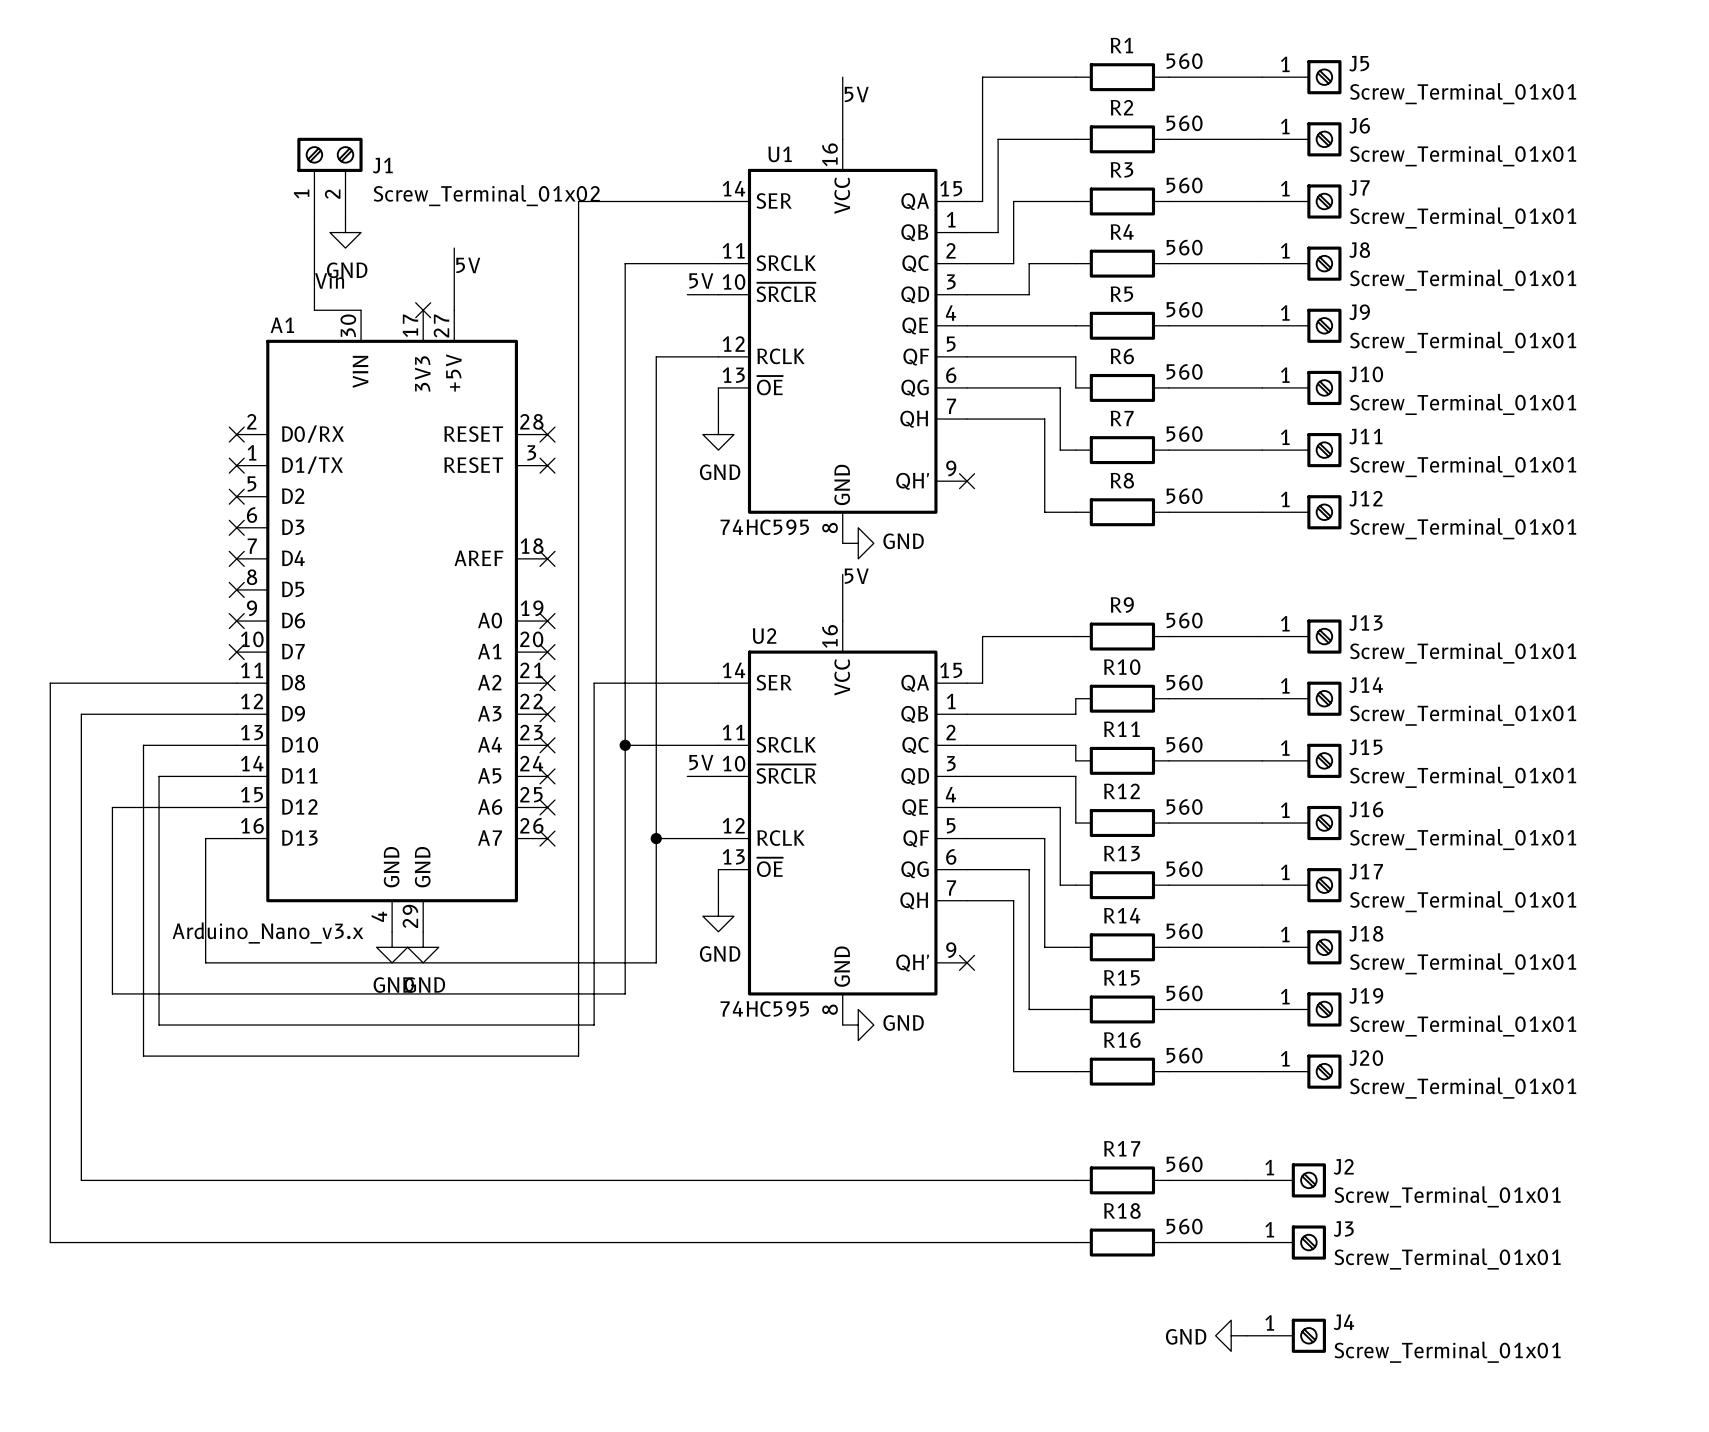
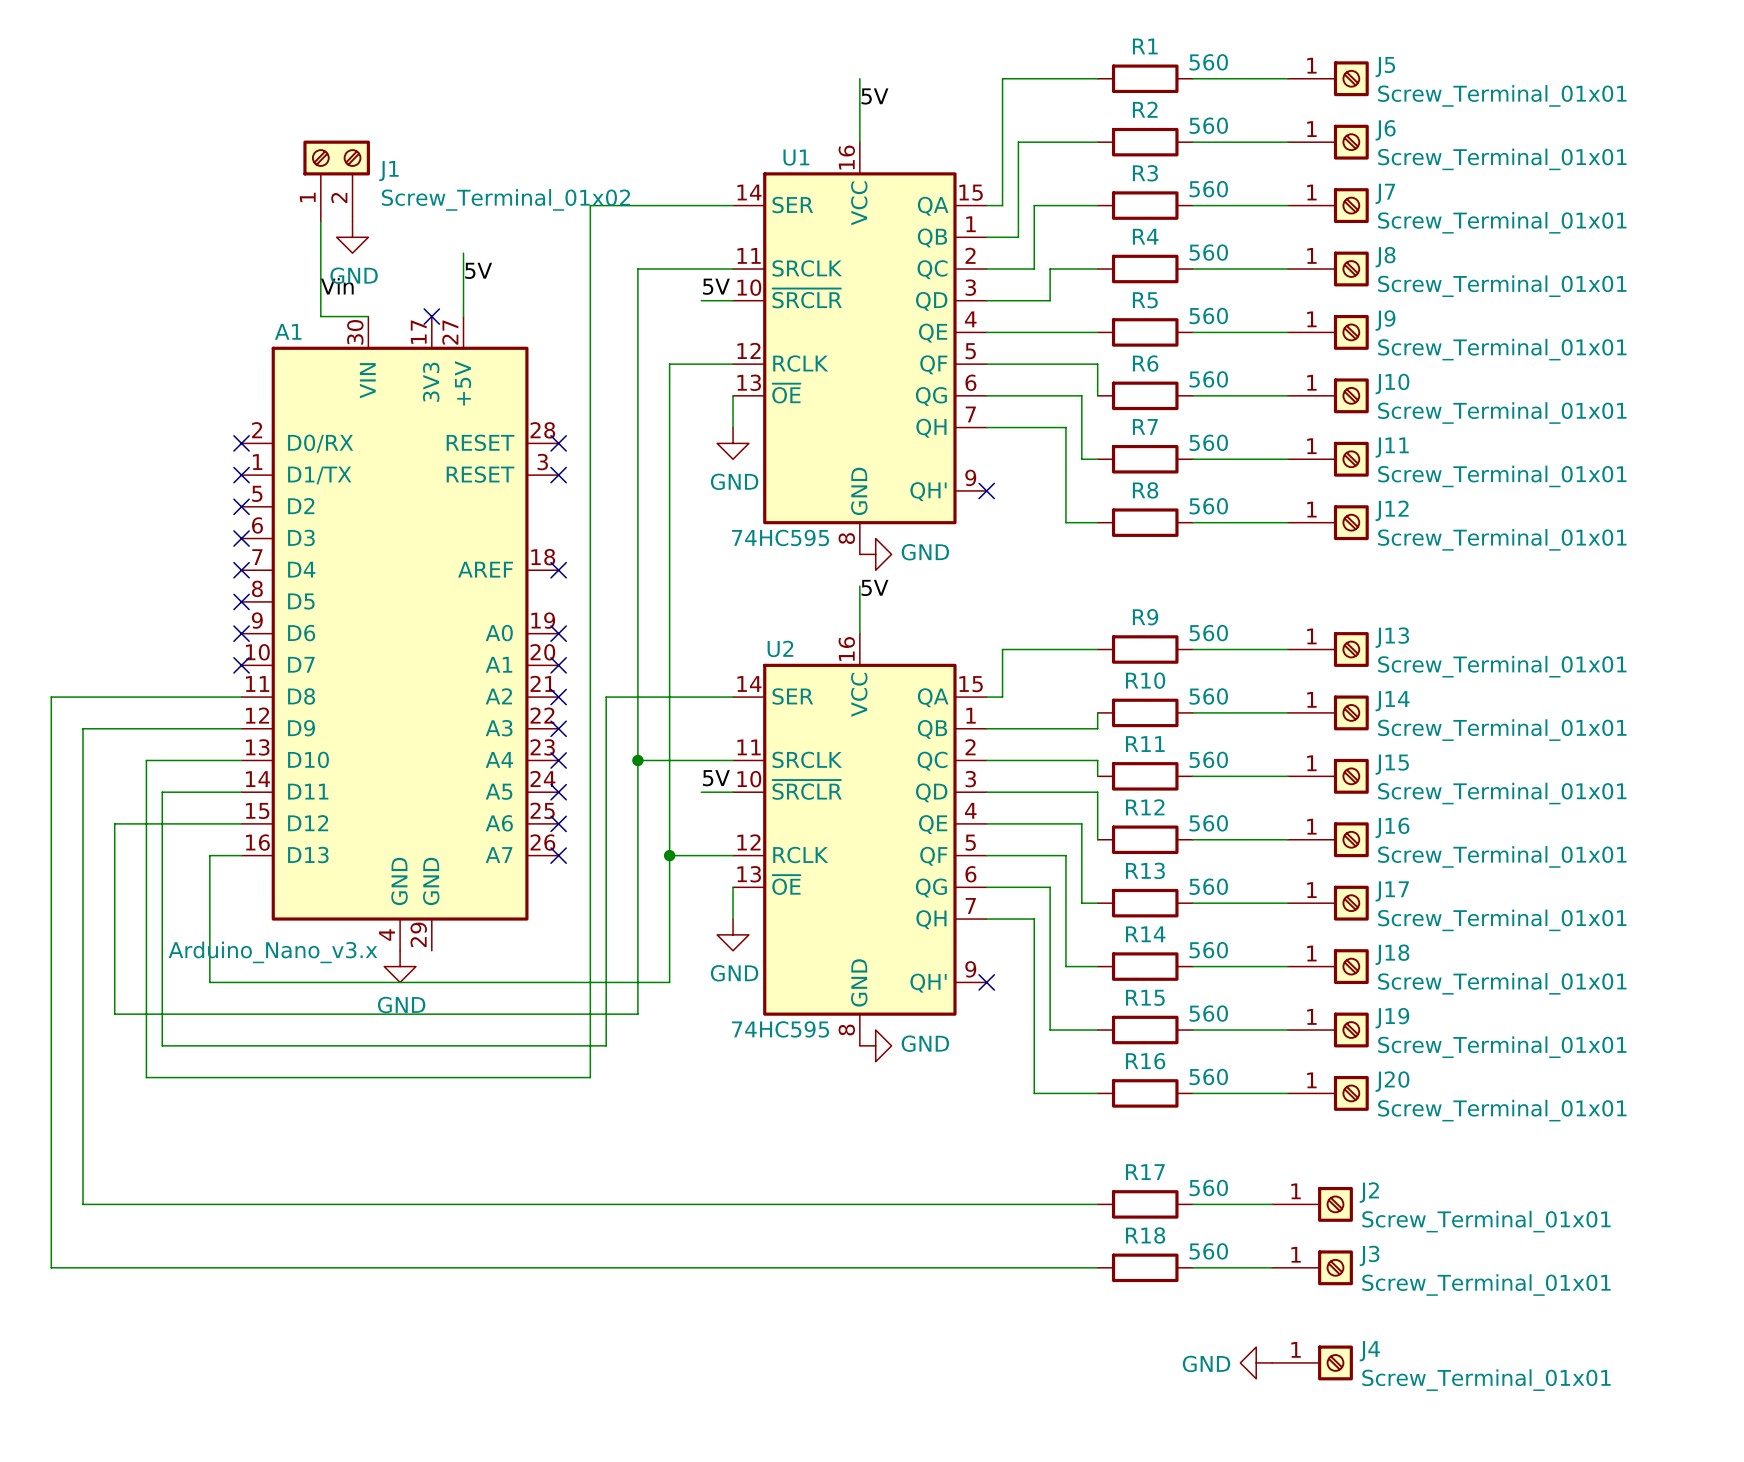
power symbol: GND (423, 947) -> none

